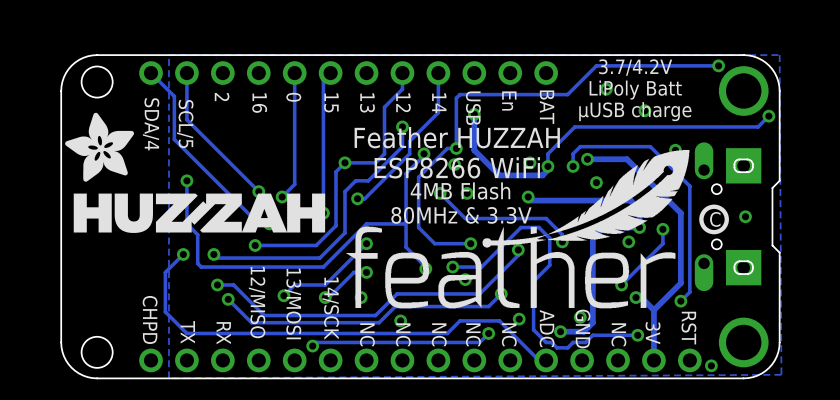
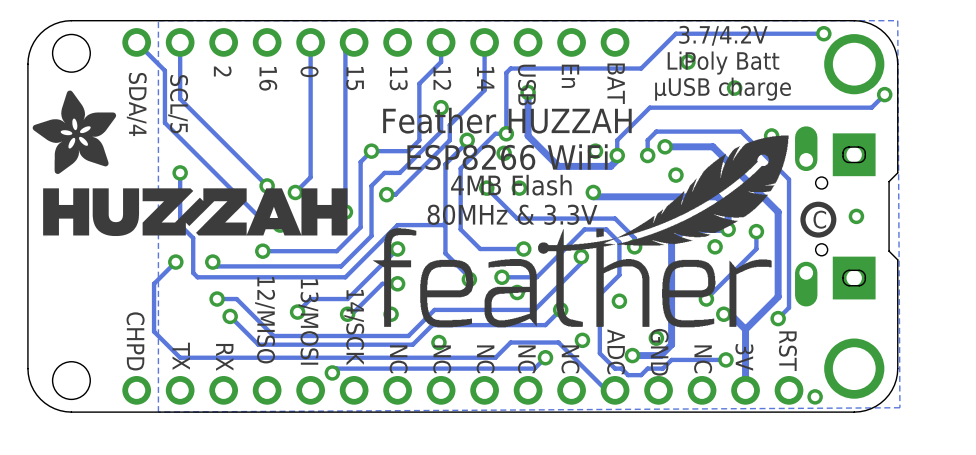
via: none -> (619, 301)

